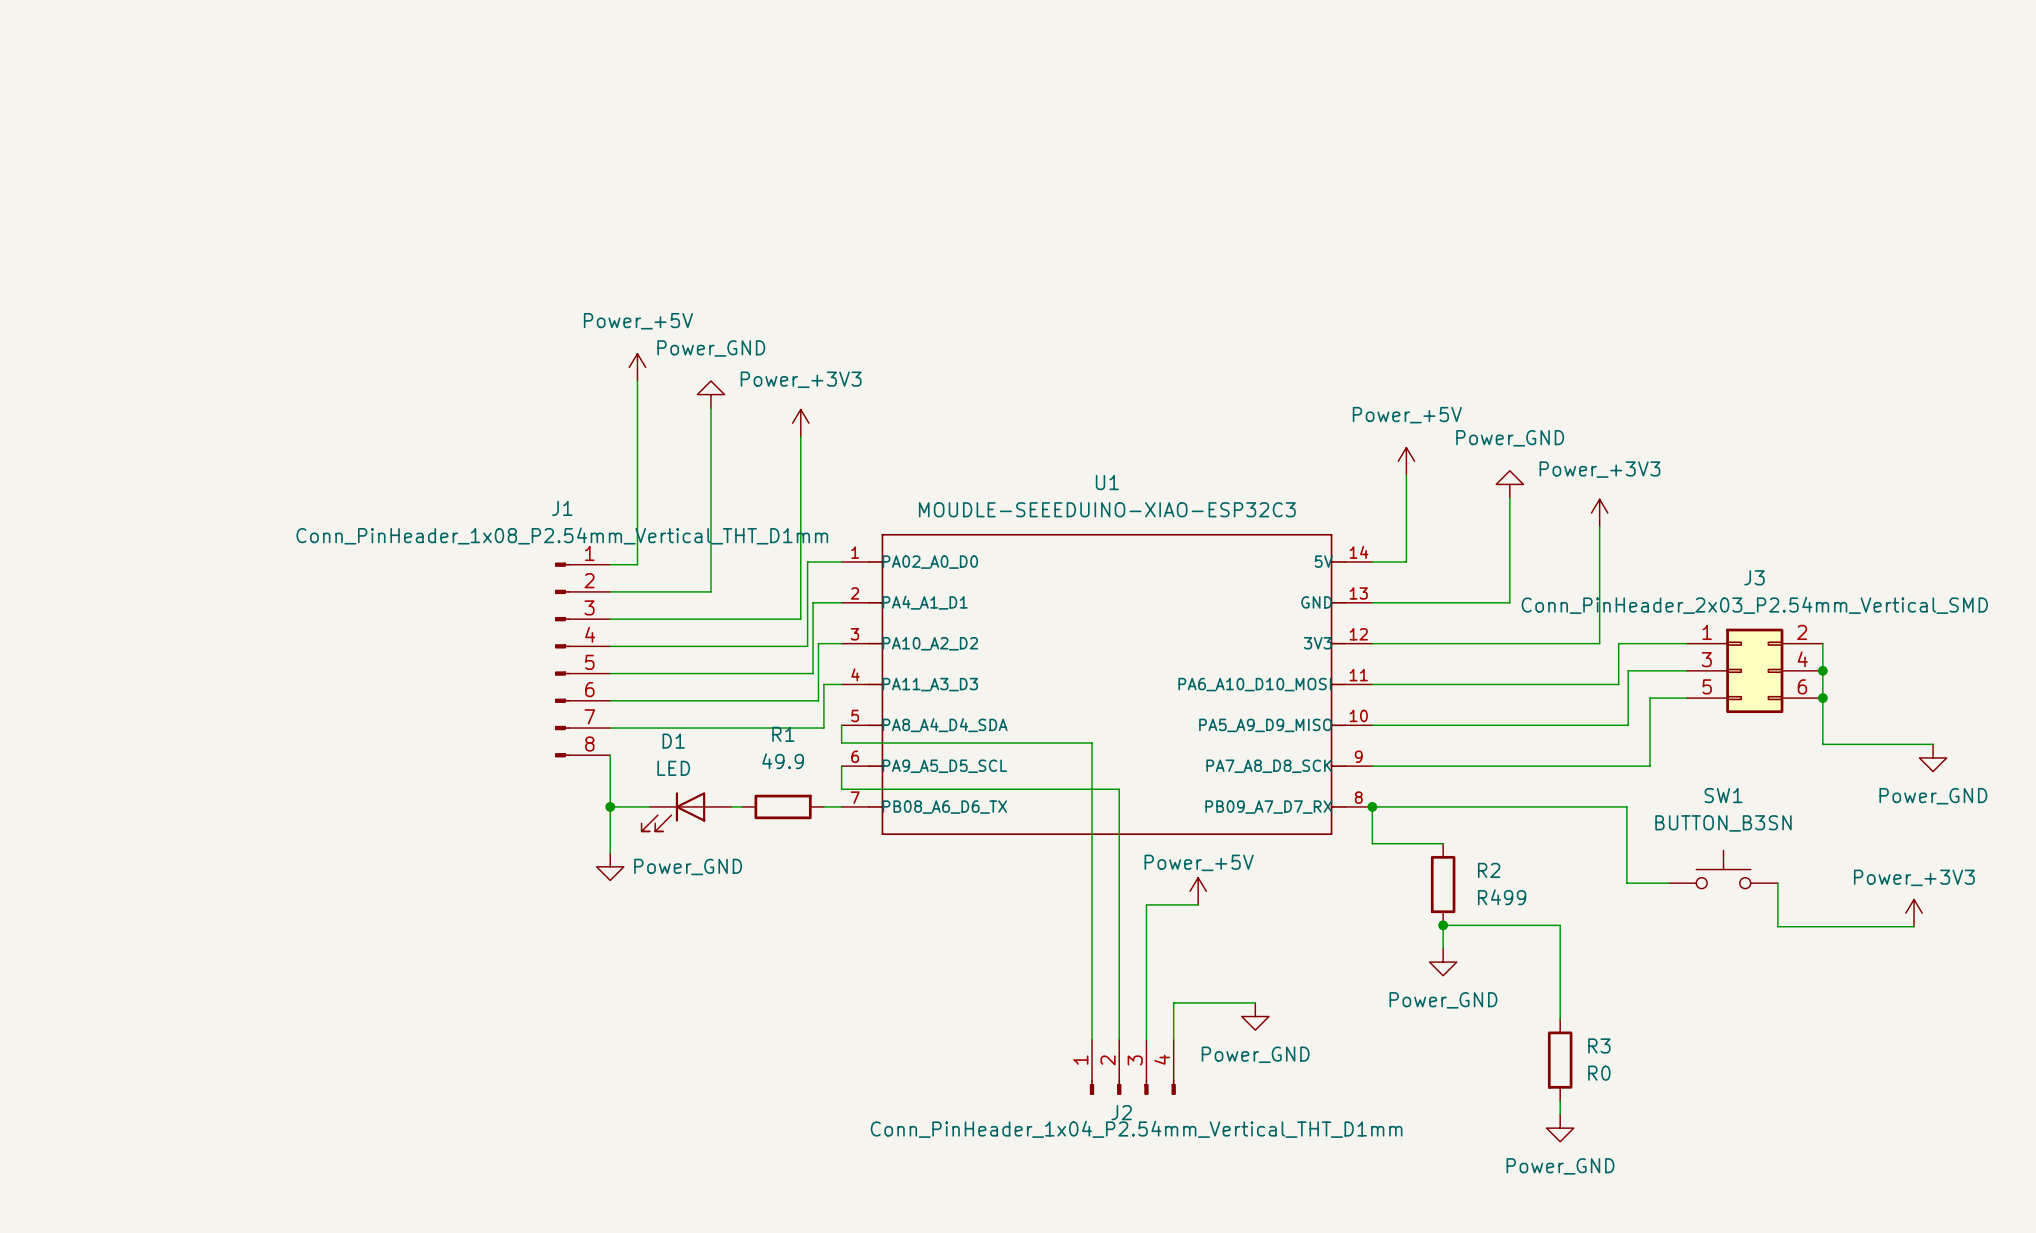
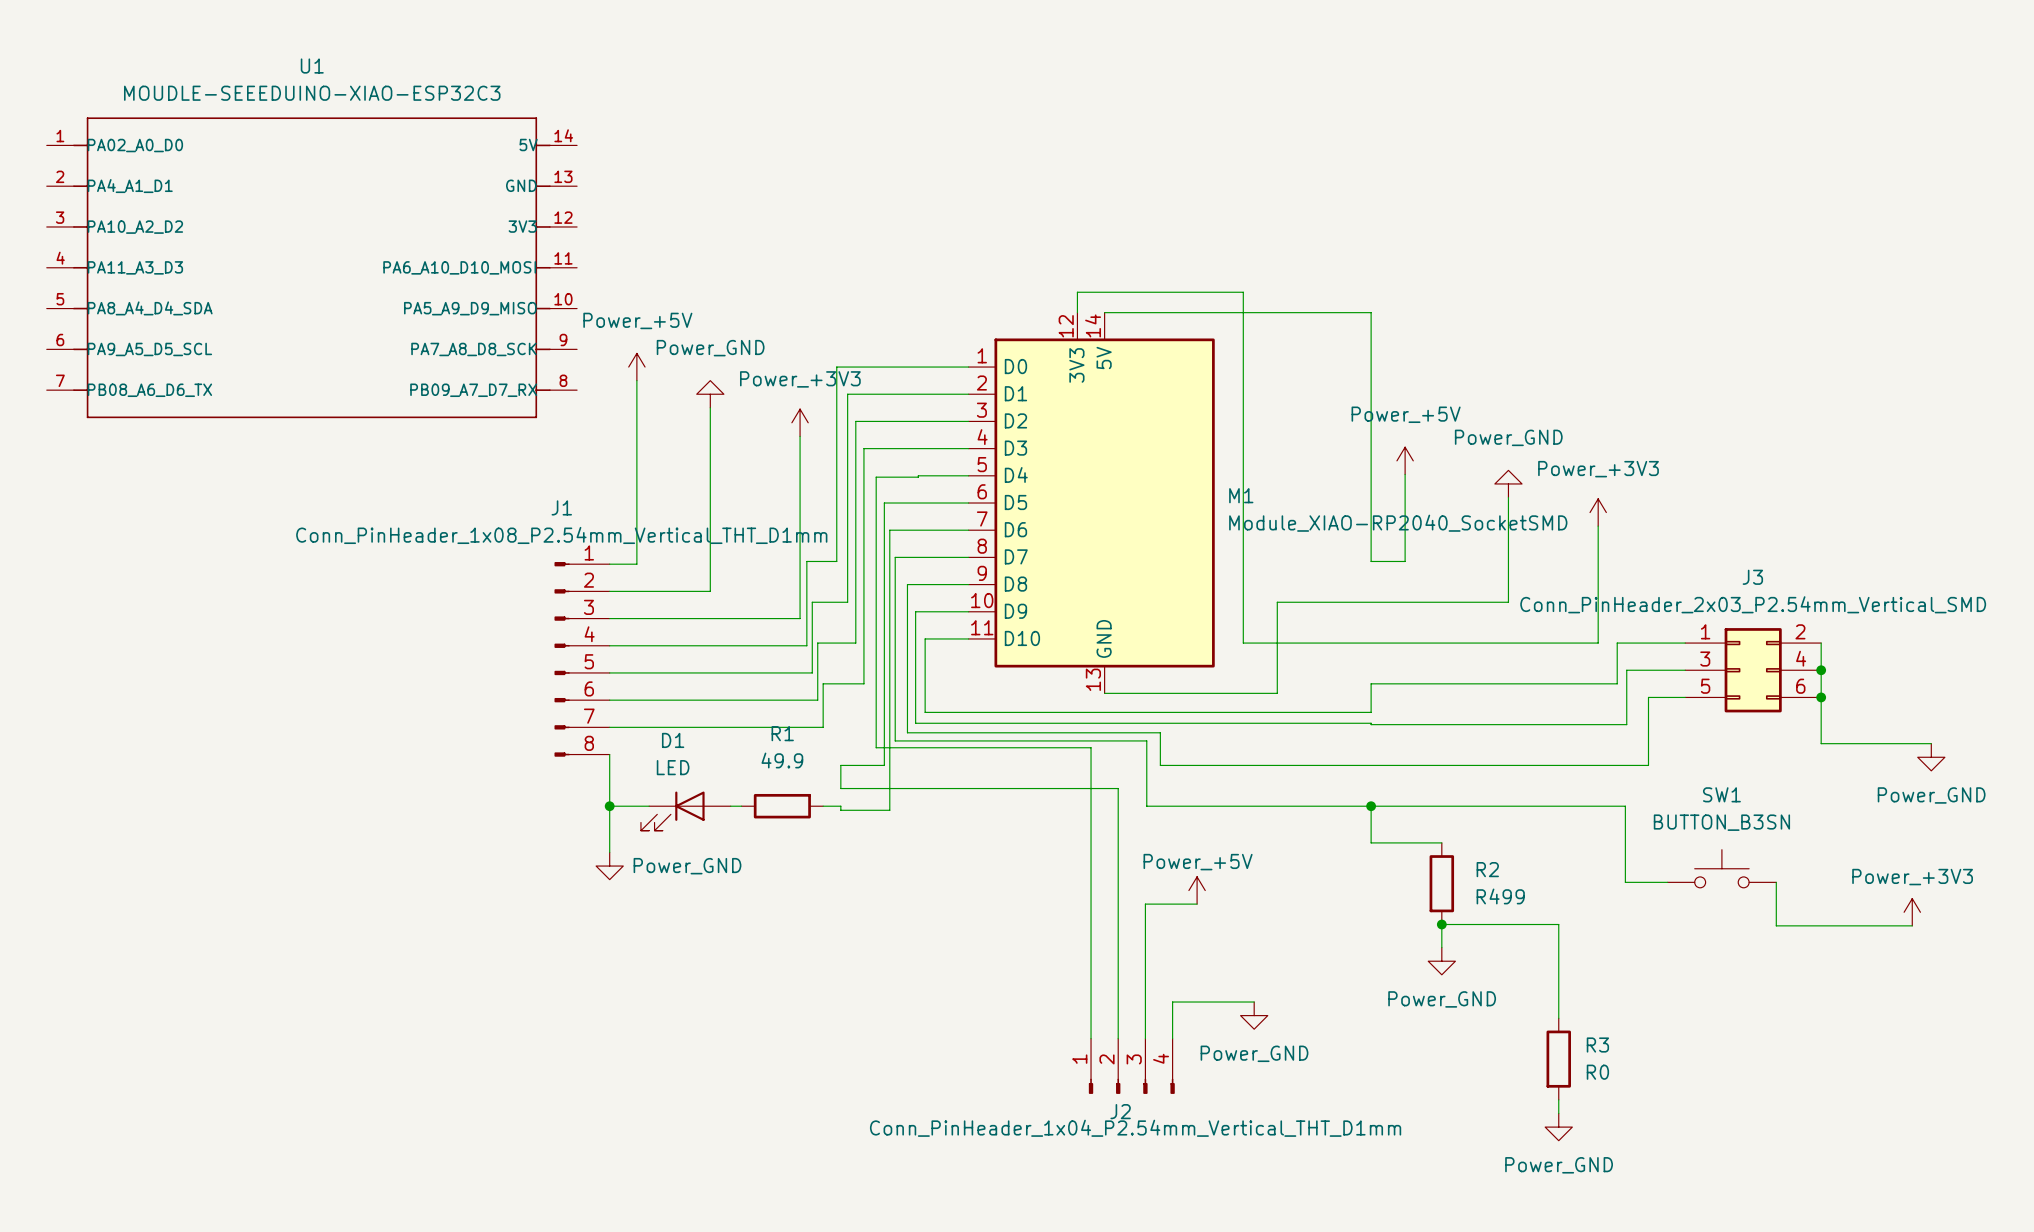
wire: none -> (1077, 312) (1077, 292) (1243, 292) (1243, 643) (1371, 643)
wire: none -> (1104, 312) (1371, 312) (1371, 561)
wire: none -> (968, 394) (847, 394) (847, 602) (840, 602)
wire: none -> (968, 421) (855, 421) (855, 643) (840, 643)
wire: none -> (968, 448) (863, 448) (863, 683) (840, 683)
wire: none -> (968, 503) (884, 503) (884, 765) (840, 765)
M1: none -> Module_XIAO-RP2040_SocketSMD (1091, 503)
wire: none -> (968, 530) (889, 530) (889, 810) (840, 810) (840, 806)
wire: none -> (968, 557) (895, 557) (895, 740) (1146, 740) (1146, 806) (1371, 806)
wire: (837, 561) (841, 561) -> (836, 561) (836, 367) (968, 367)
wire: none -> (968, 584) (907, 584) (907, 732) (1160, 732) (1160, 765) (1371, 765)
wire: none -> (1371, 602) (1277, 602) (1277, 693) (1104, 693)
wire: none -> (968, 611) (915, 611) (915, 723) (1371, 724)
wire: none -> (968, 638) (925, 638) (925, 712) (1371, 712) (1371, 683)
U1 position: (1106, 684) -> (311, 267)
wire: (841, 725) (841, 742) (1092, 742) (1092, 748) -> (968, 475) (876, 477) (876, 747) (1091, 747)

